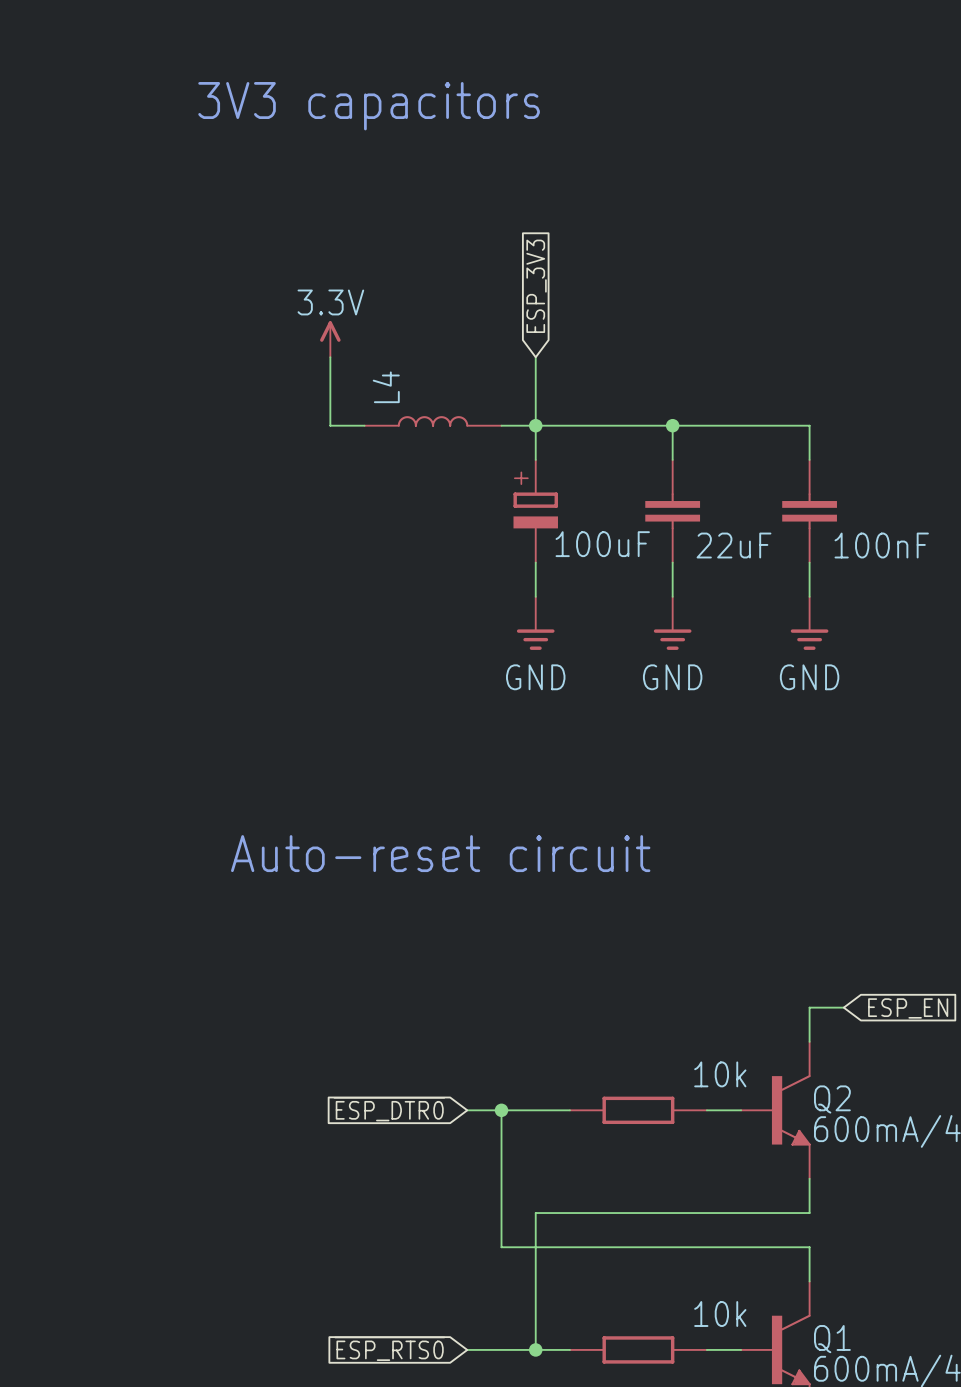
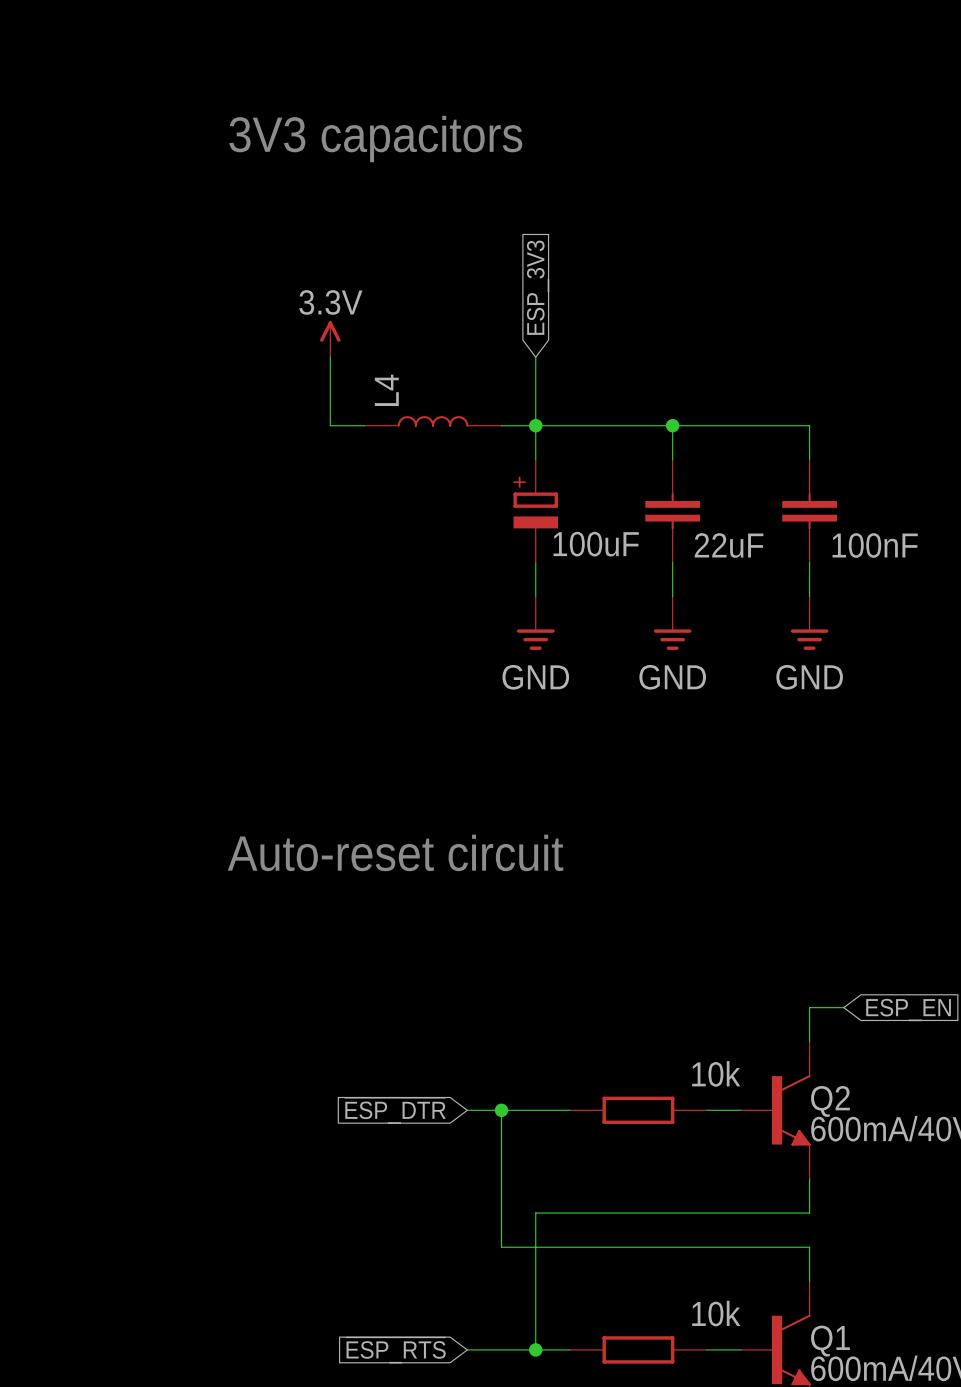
text position: 3V3 capacitors (369, 106) -> 3V3 capacitors (375, 138)
global label: ~{ESP_DTR0} (389, 1109) -> ~{ESP_DTR} (395, 1110)
global label: ~{ESP_RTS0} (389, 1348) -> ~{ESP_RTS} (395, 1350)

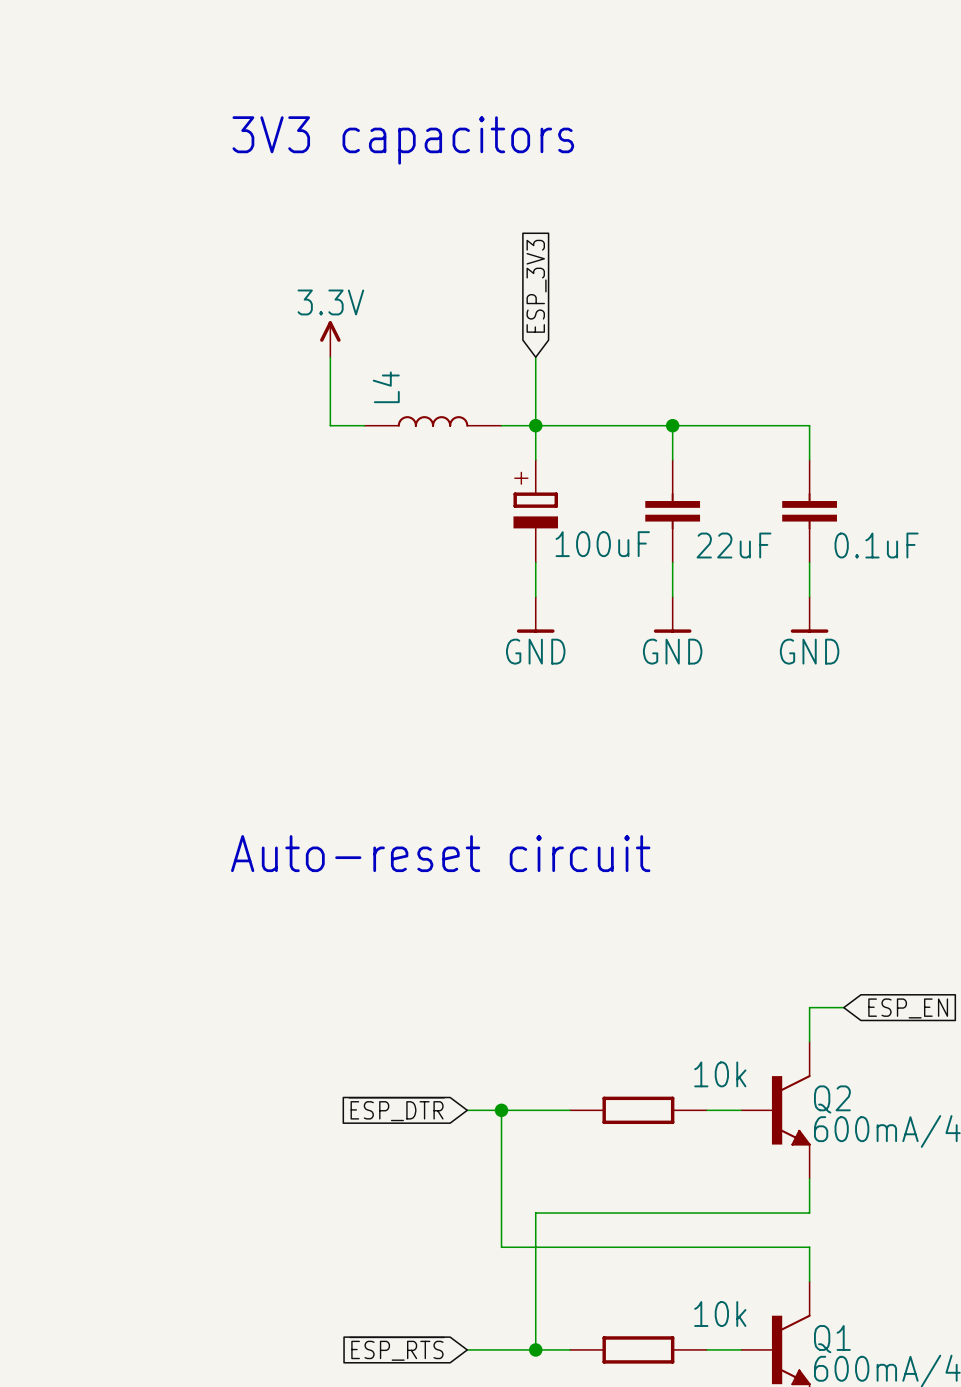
part value: 100nF (875, 545) -> 0.1uF (876, 545)
power symbol shape: [516, 596, 555, 650] -> [516, 596, 555, 633]
power symbol shape: [653, 596, 692, 650] -> [653, 596, 692, 633]
power symbol shape: [790, 596, 829, 650] -> [790, 596, 829, 633]

